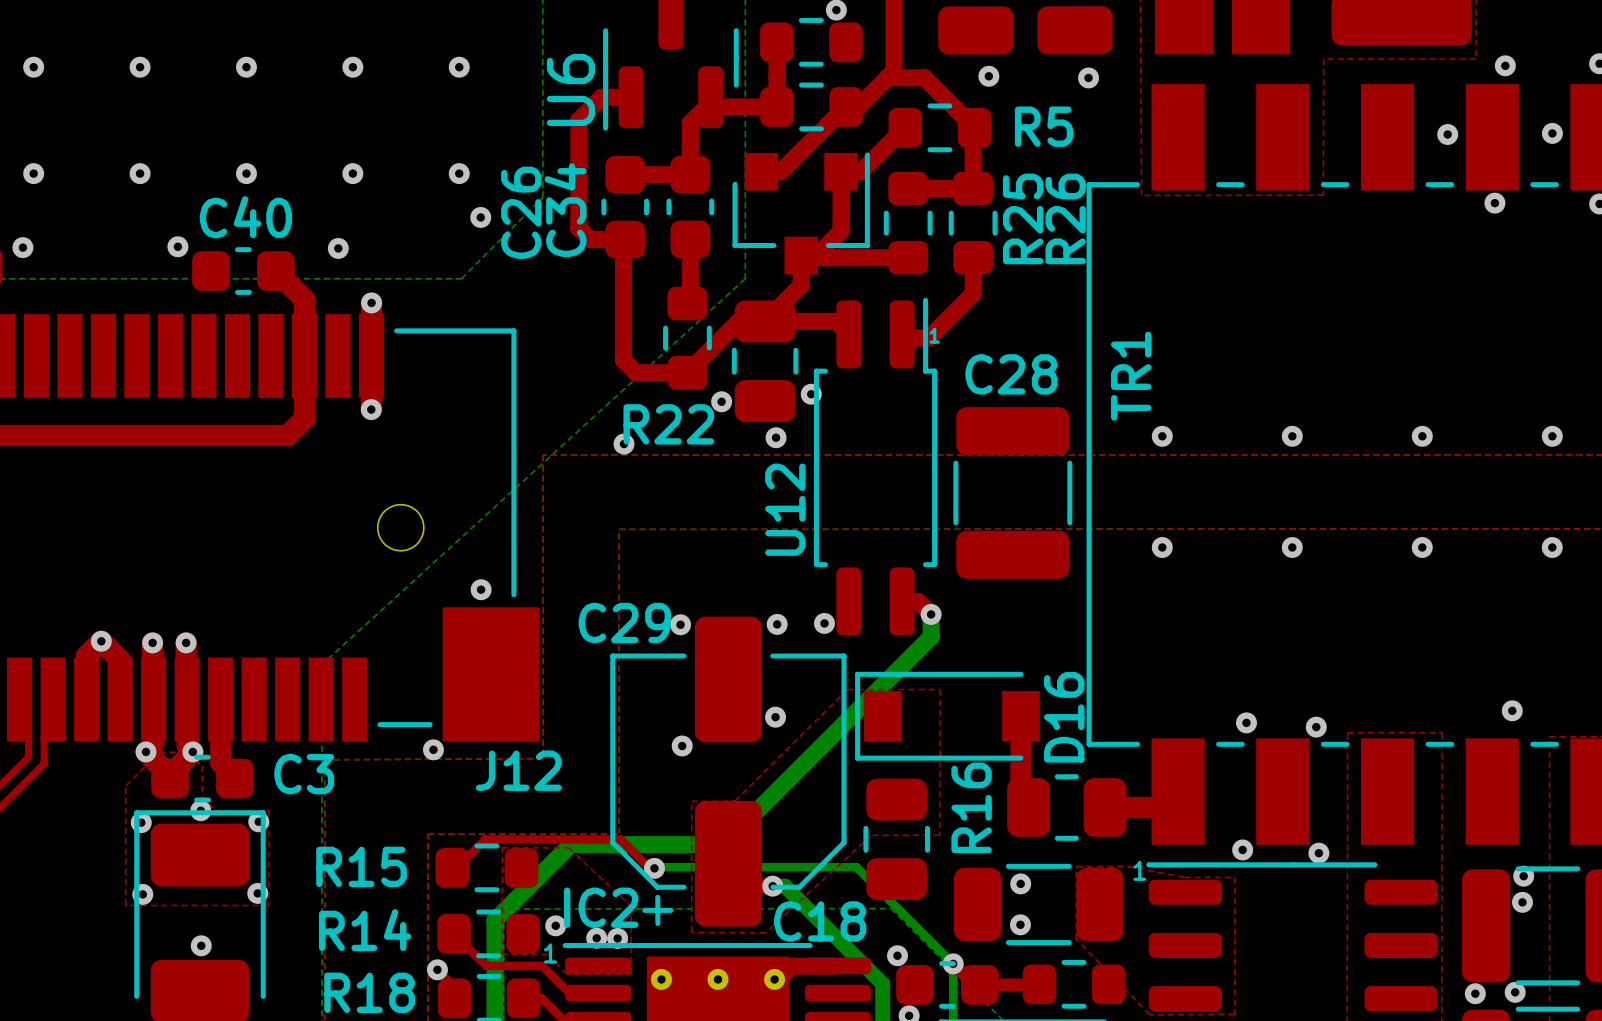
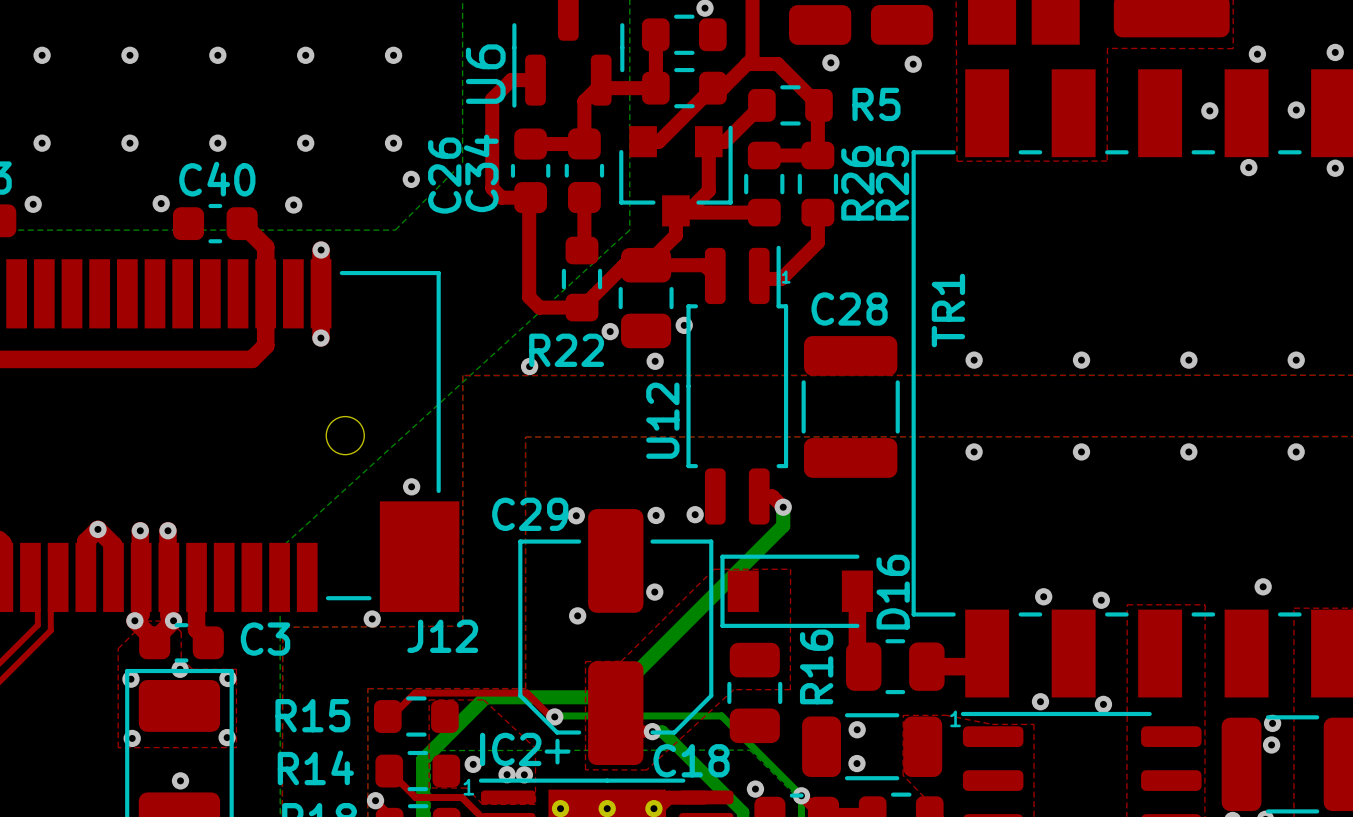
R25 name position: R25 (1023, 218) -> R25 (892, 183)
R26 name position: R26 (1065, 218) -> R26 (857, 183)

